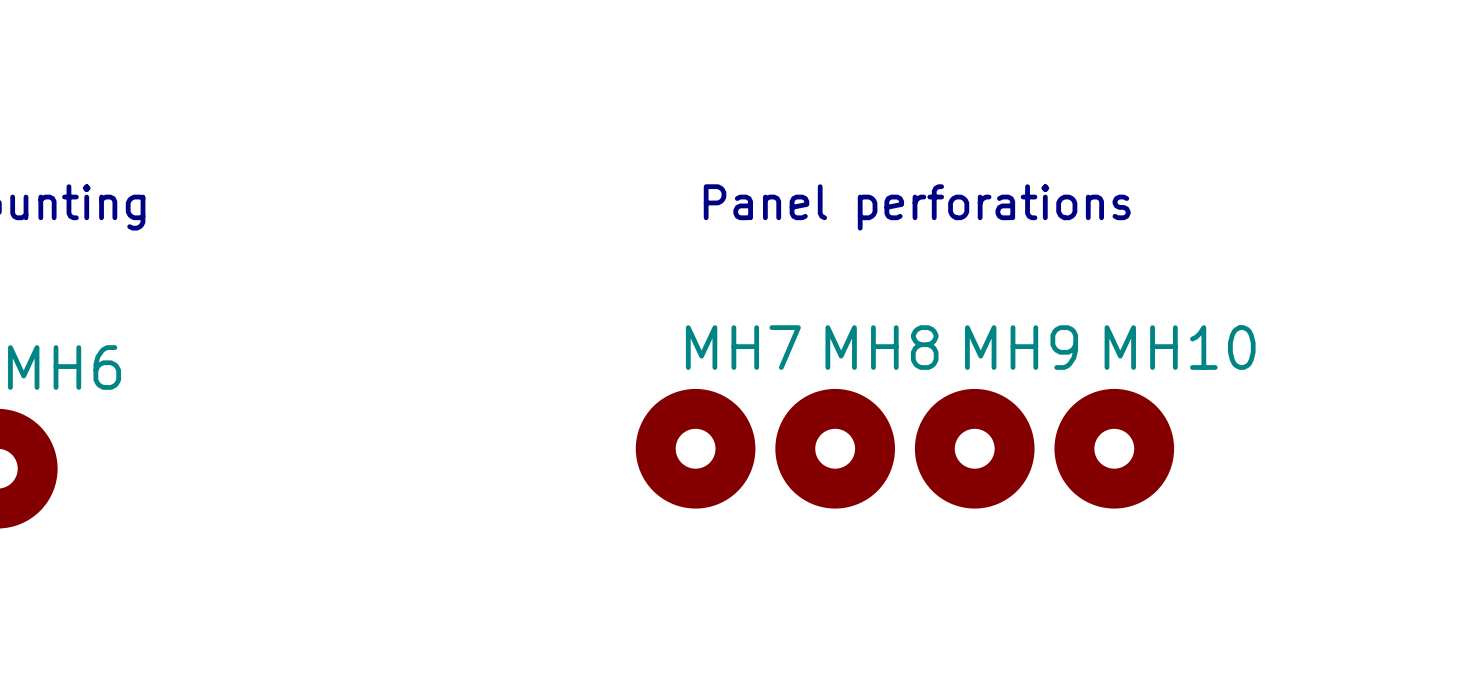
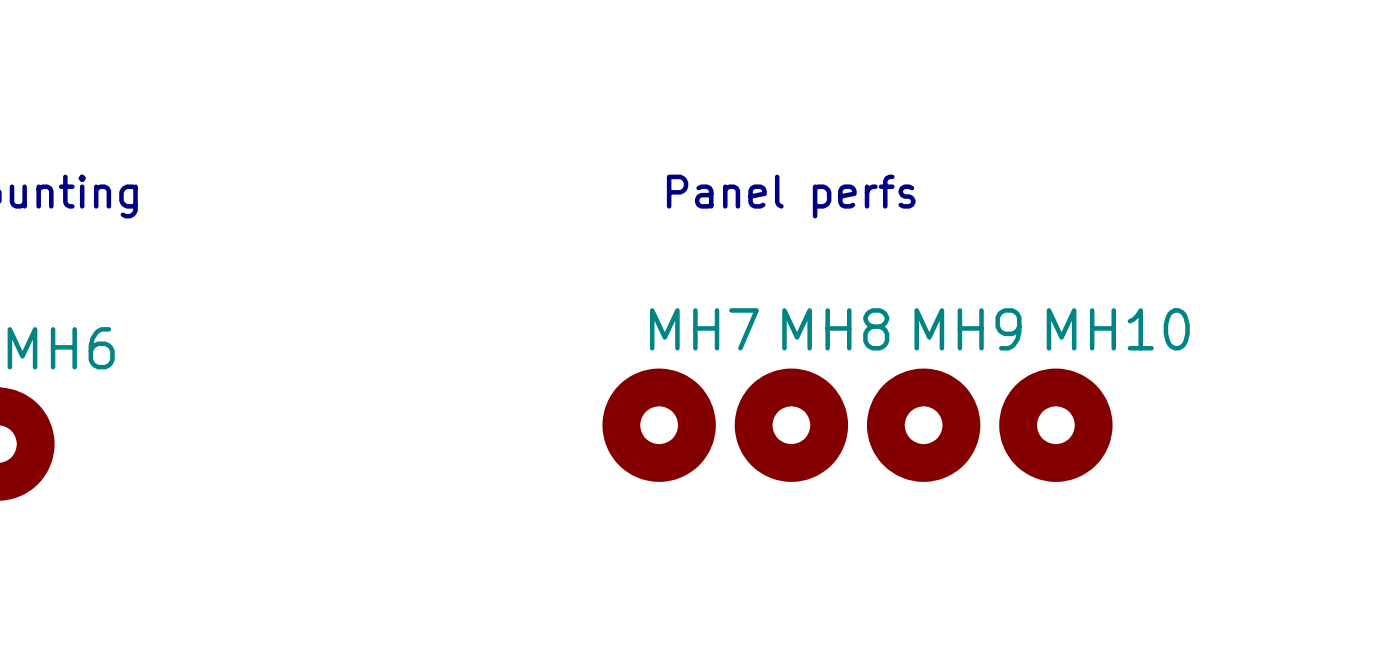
text: Panel perforations (917, 207) -> Panel perfs (791, 196)

